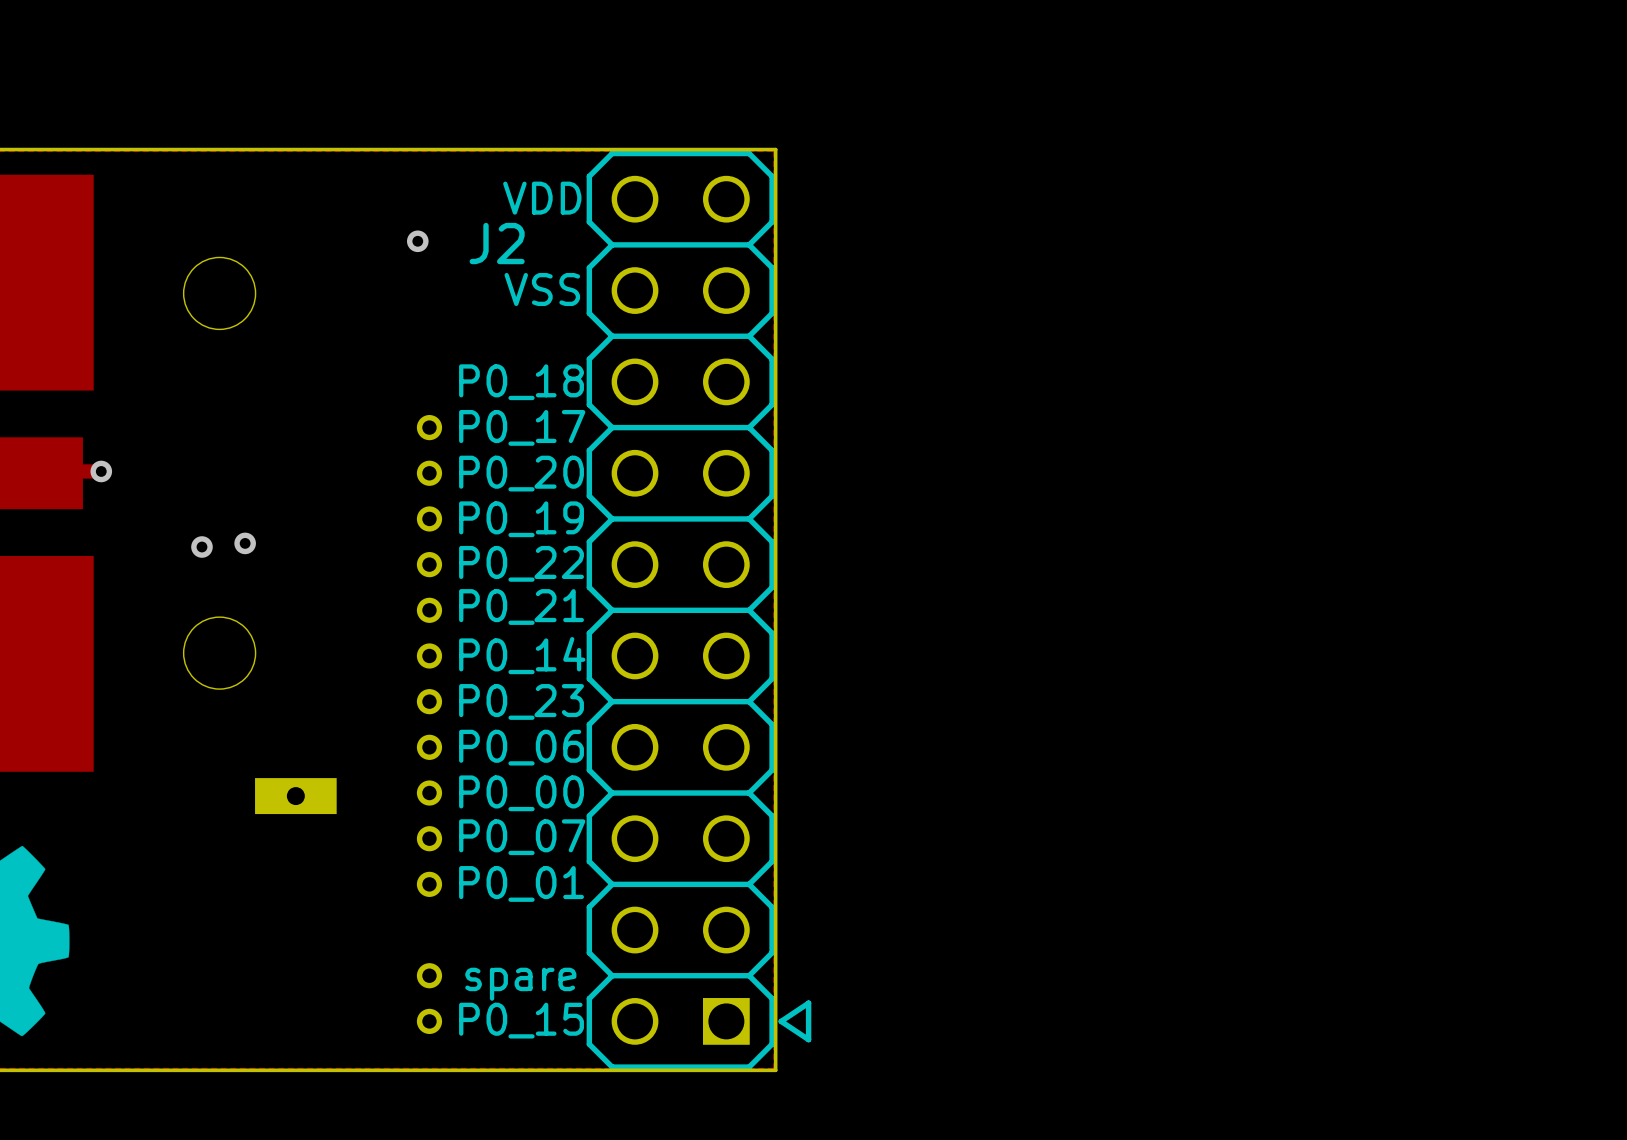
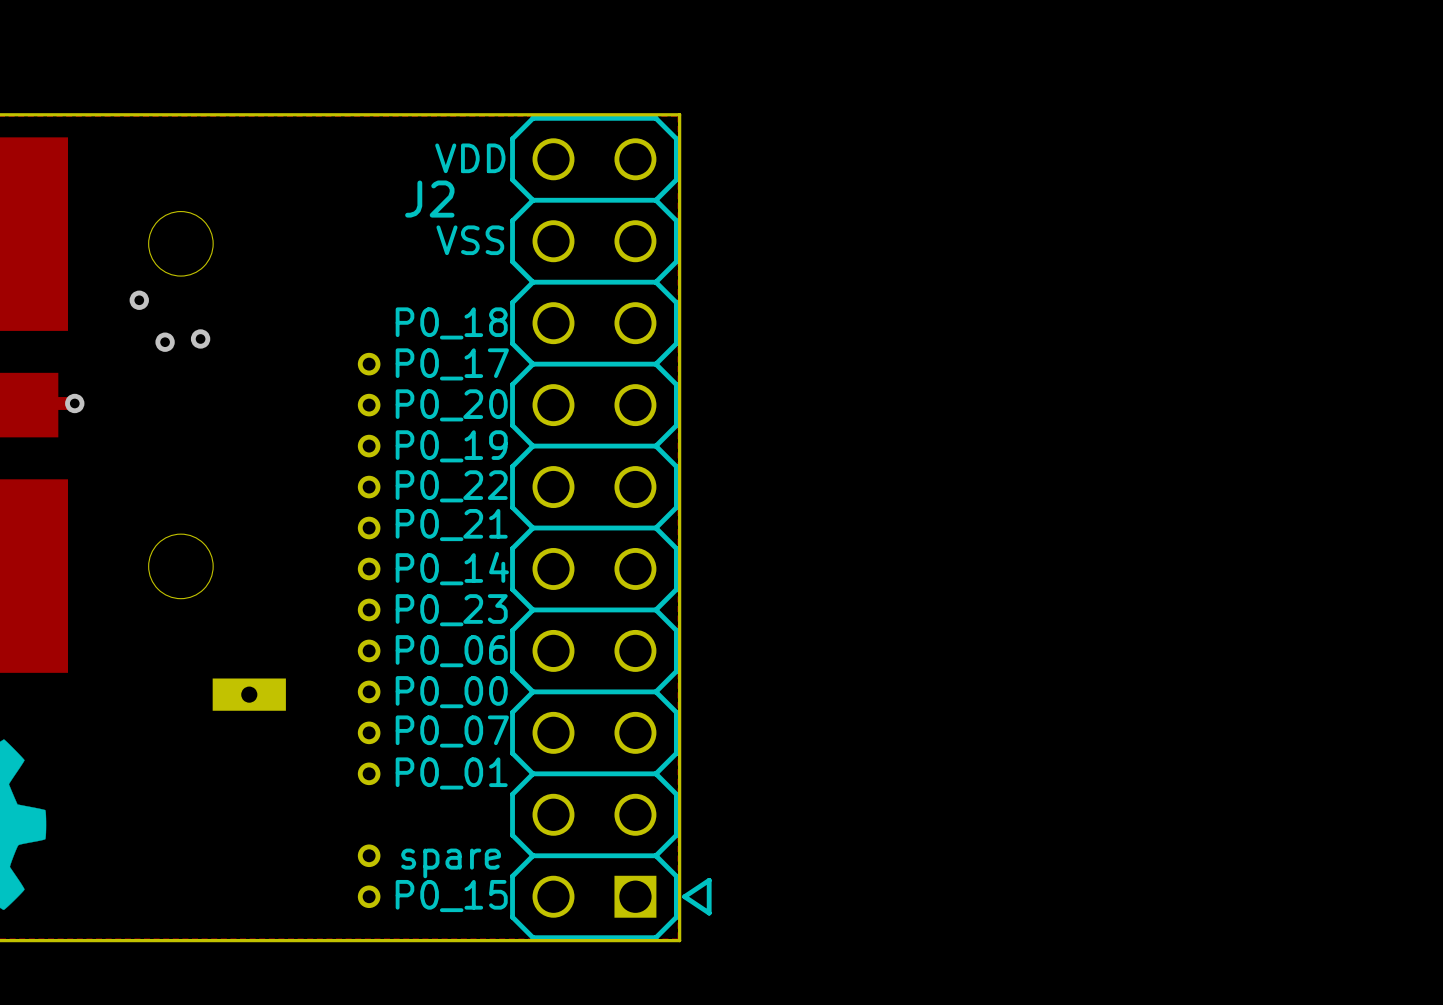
via: (417, 241) -> none
via: none -> (139, 300)
via: none -> (200, 338)
via: none -> (165, 342)
via: (245, 543) -> none
via: (201, 547) -> none

